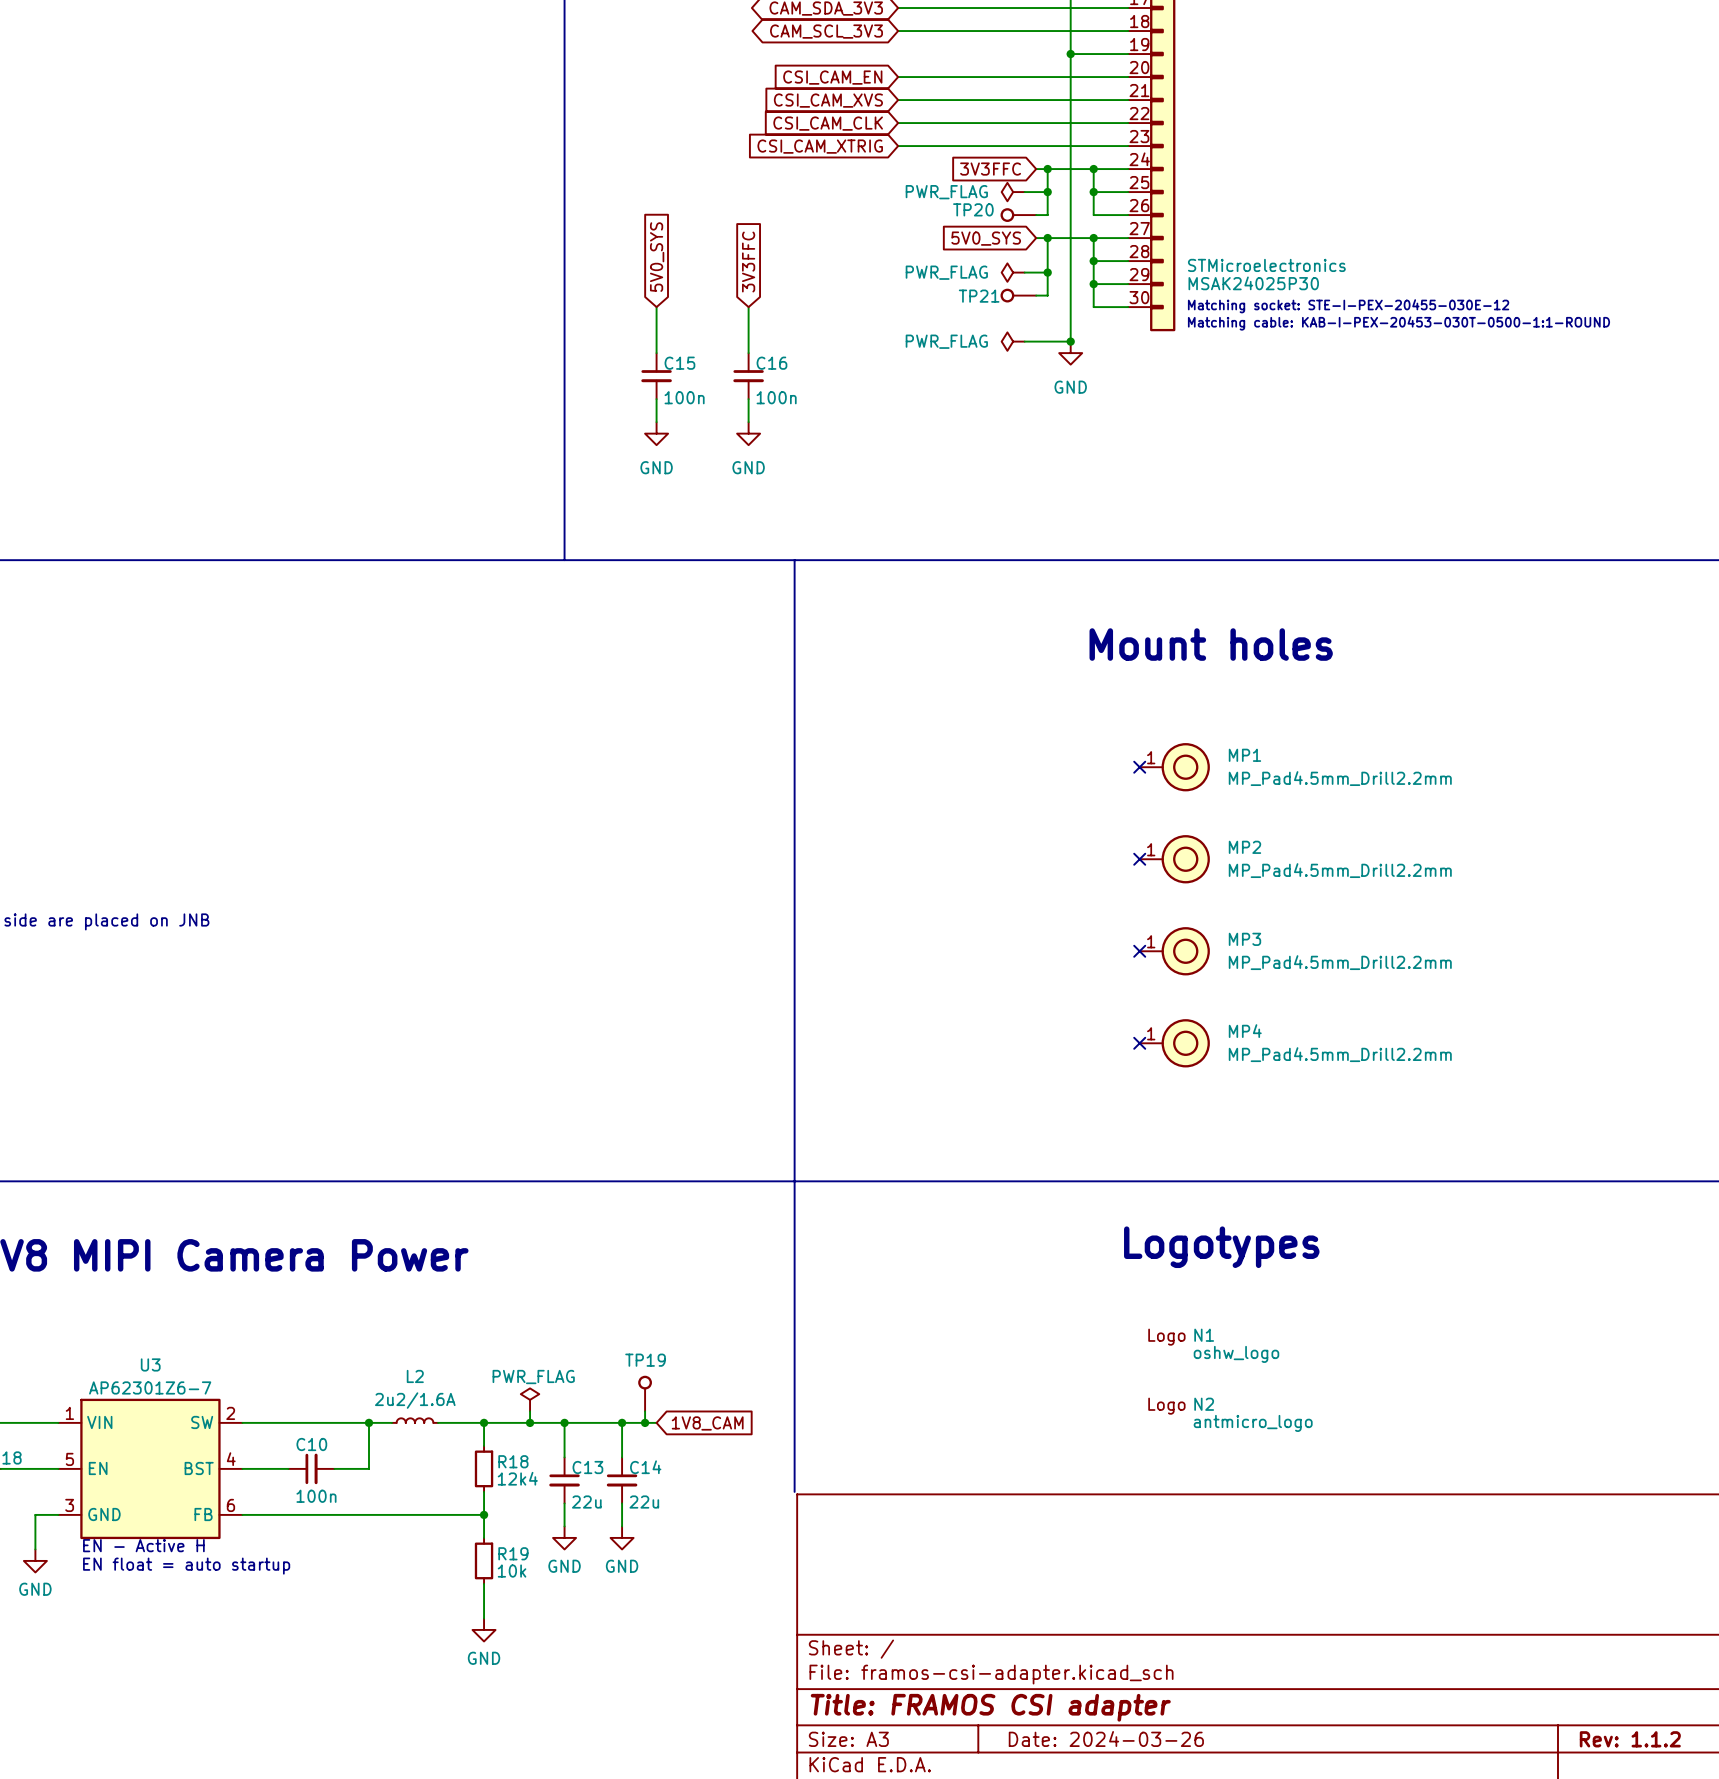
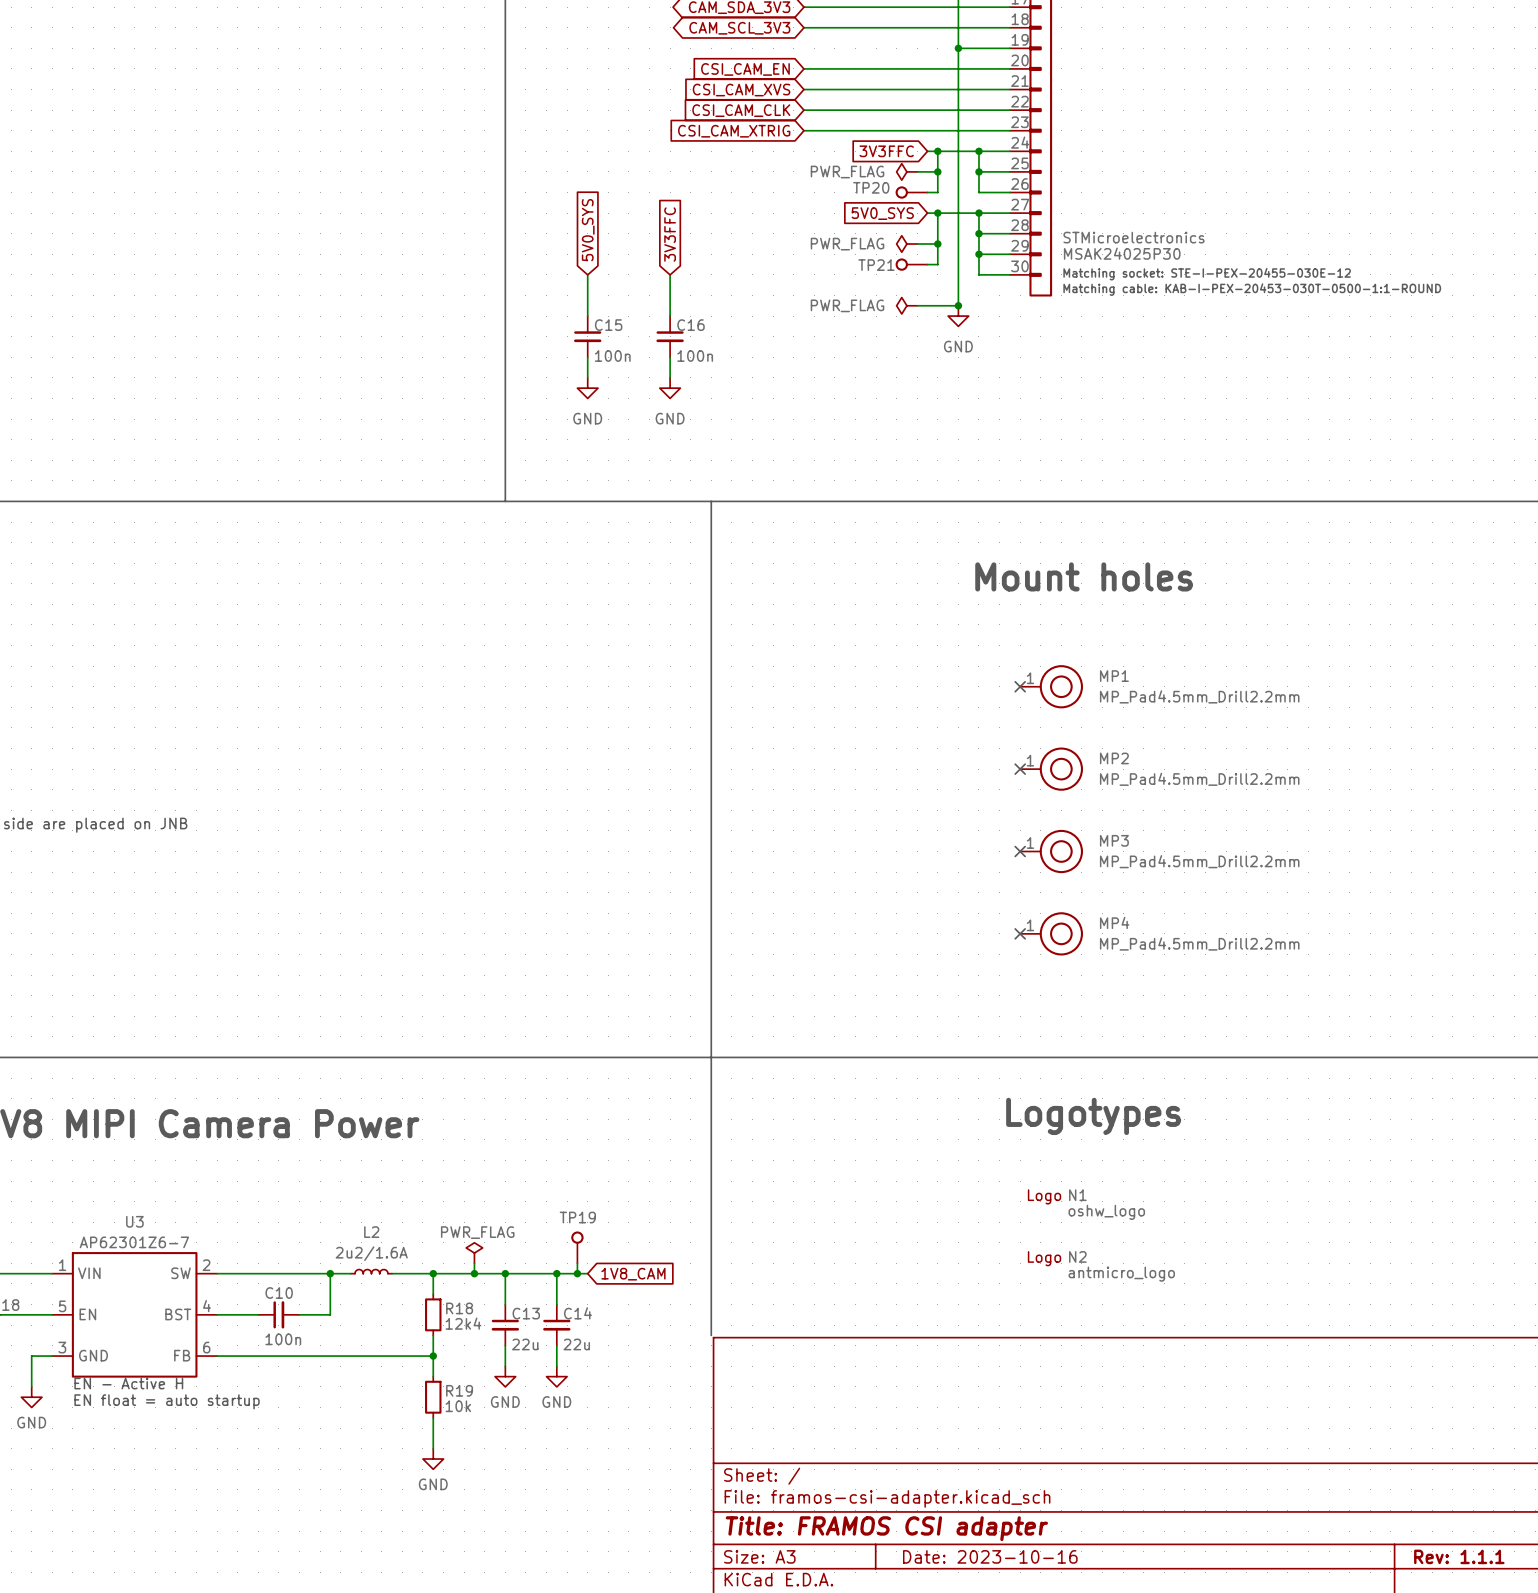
title block: Date: 2024-03-26 (1106, 1739) -> Date: 2023-10-16 (990, 1556)
title block: Rev: 1.1.2 (1630, 1739) -> Rev: 1.1.1 (1459, 1556)

